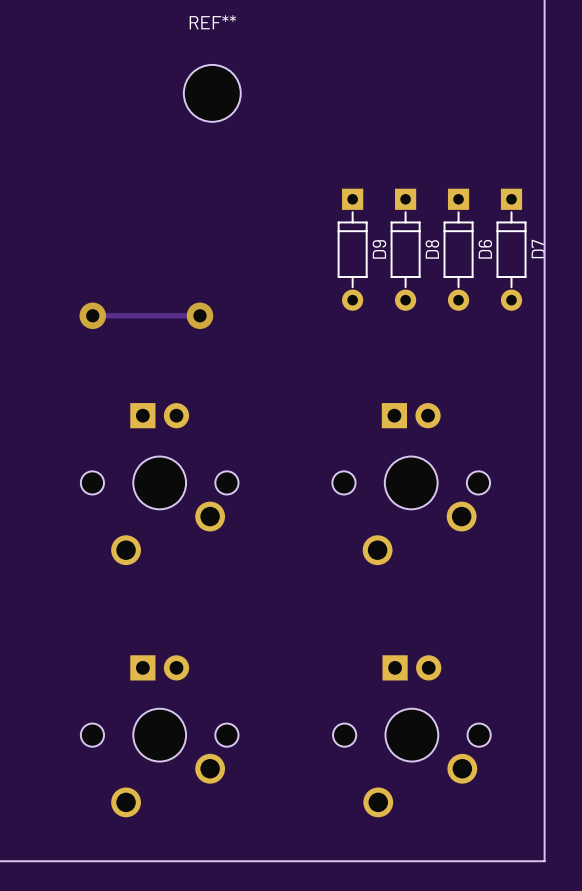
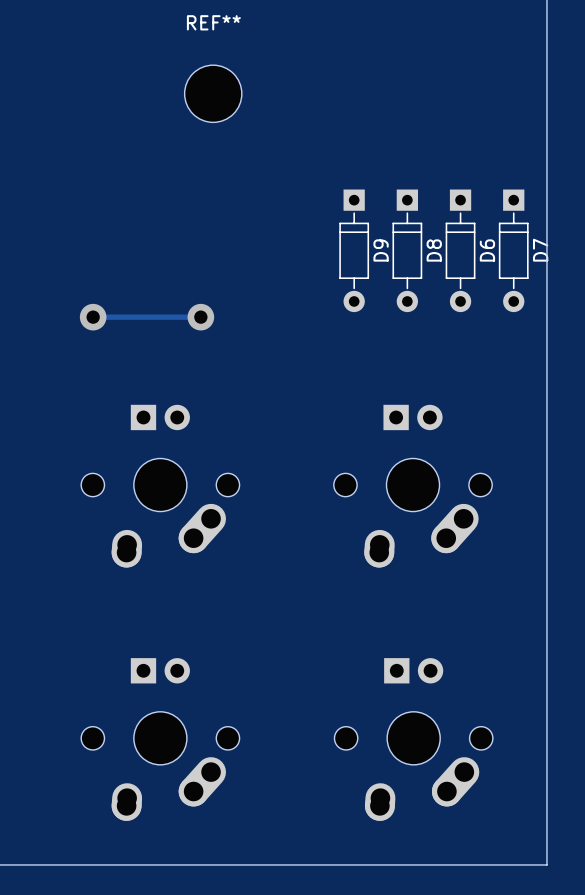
part footprint: [80, 403, 239, 566] -> [81, 404, 240, 568]
part footprint: [332, 403, 491, 566] -> [333, 404, 493, 568]
part footprint: [80, 655, 239, 818] -> [81, 658, 240, 821]
part footprint: [333, 655, 491, 818] -> [334, 658, 493, 821]

